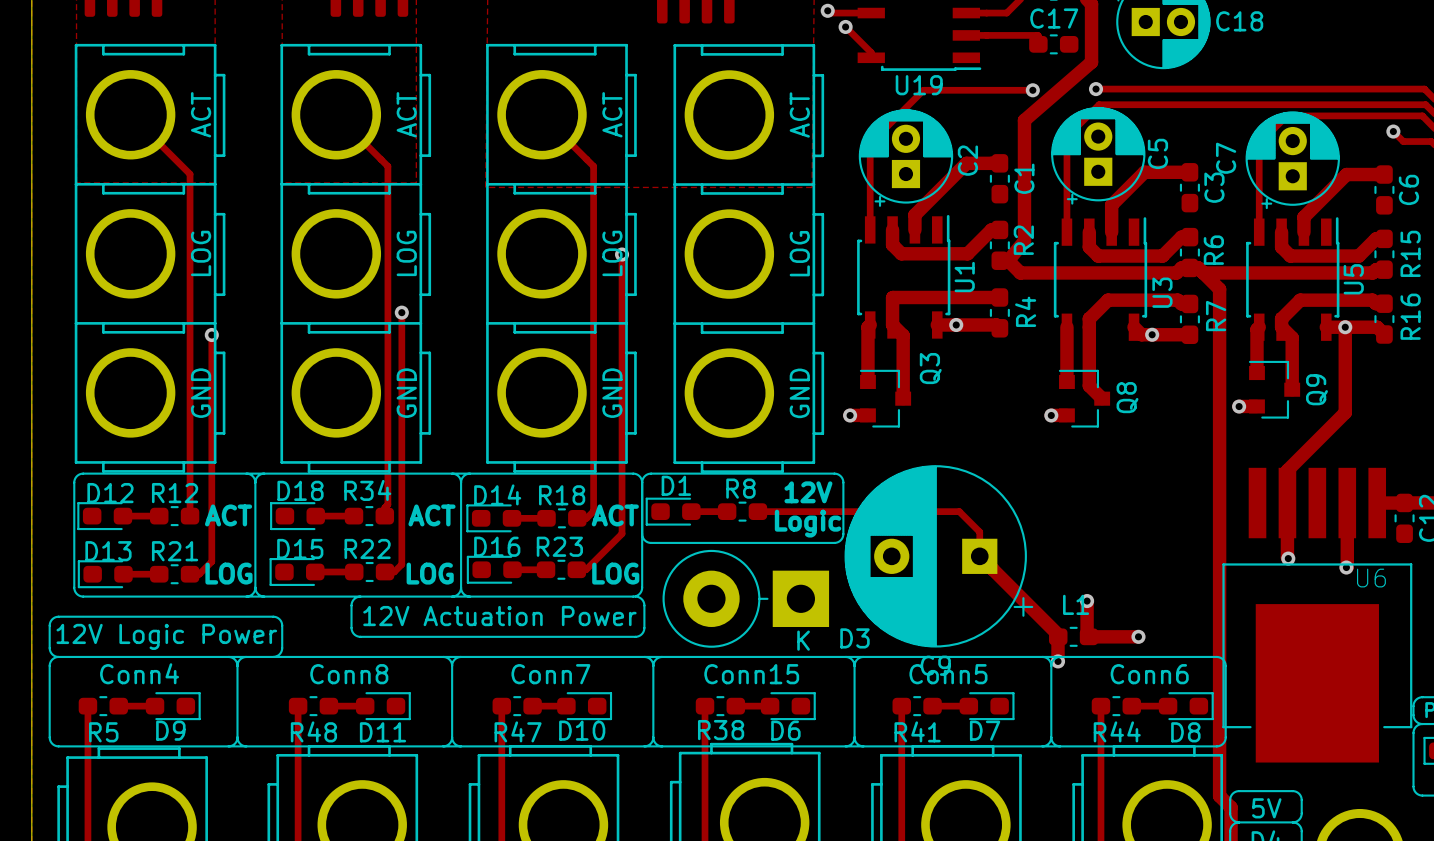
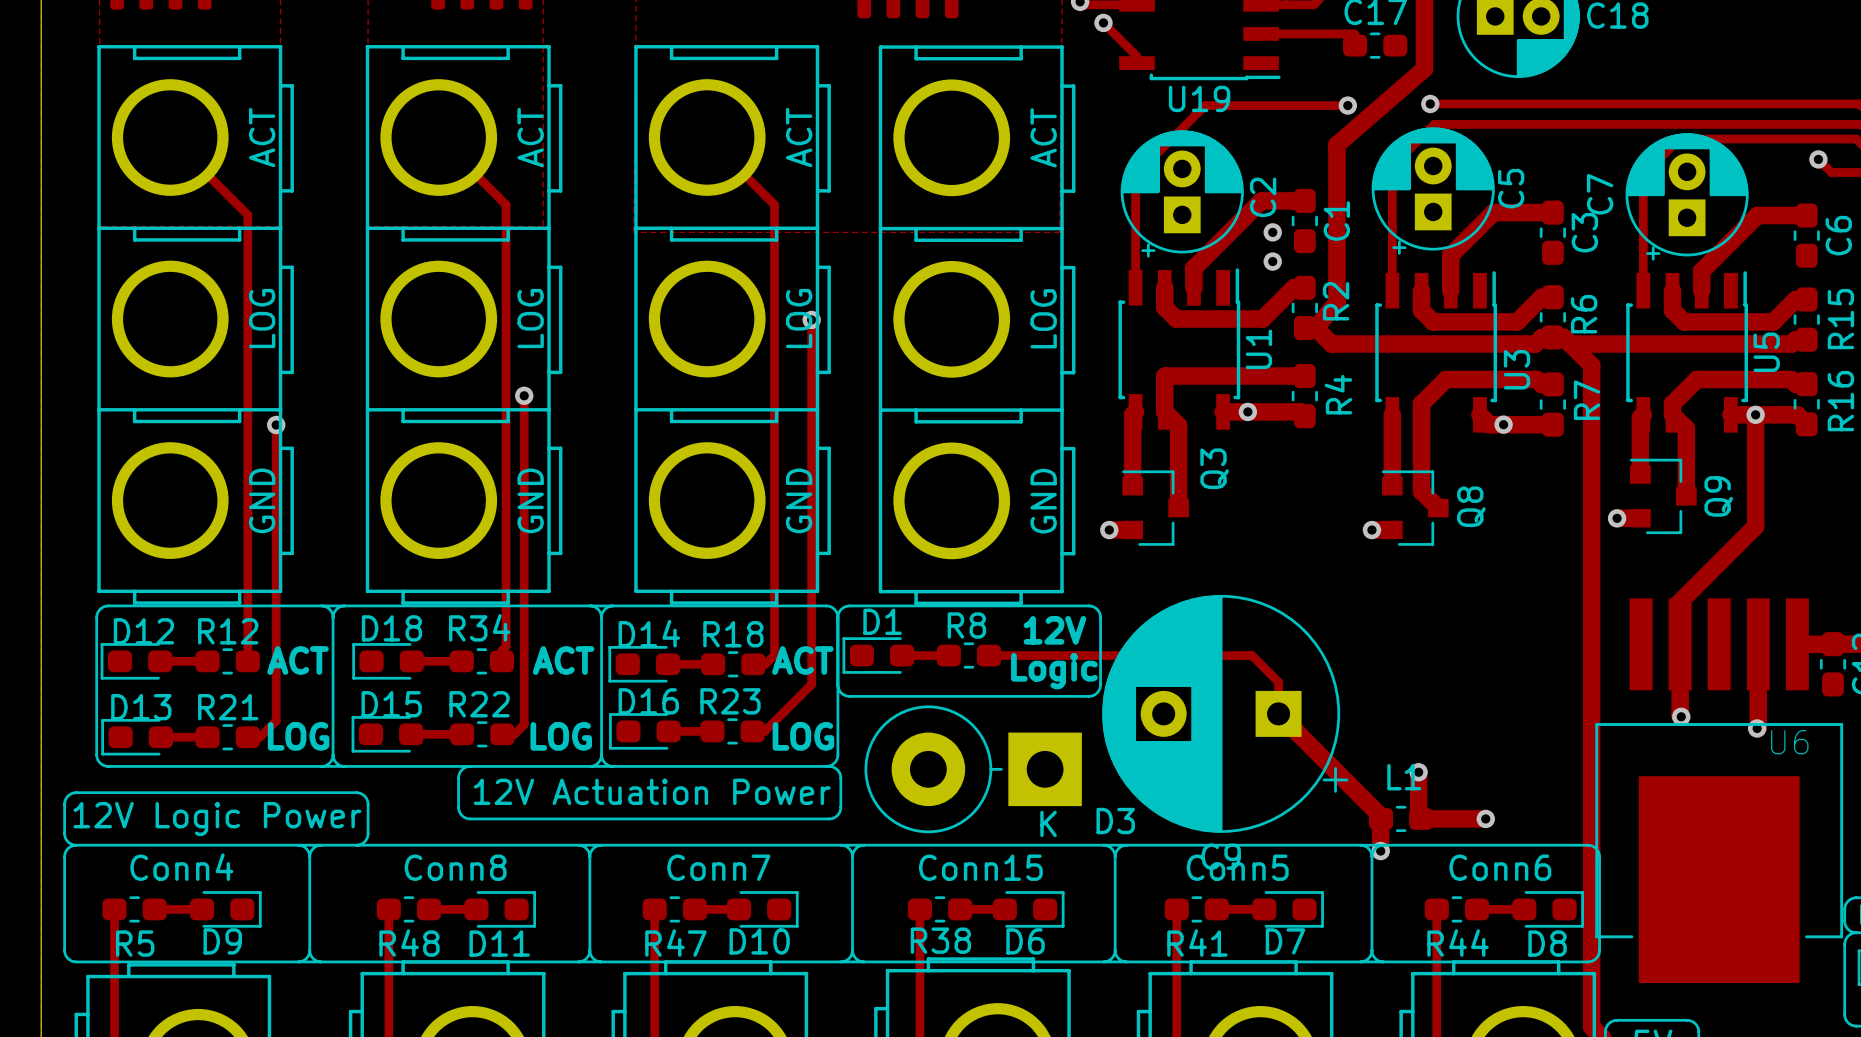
via: none -> (1272, 232)
via: none -> (1272, 261)

